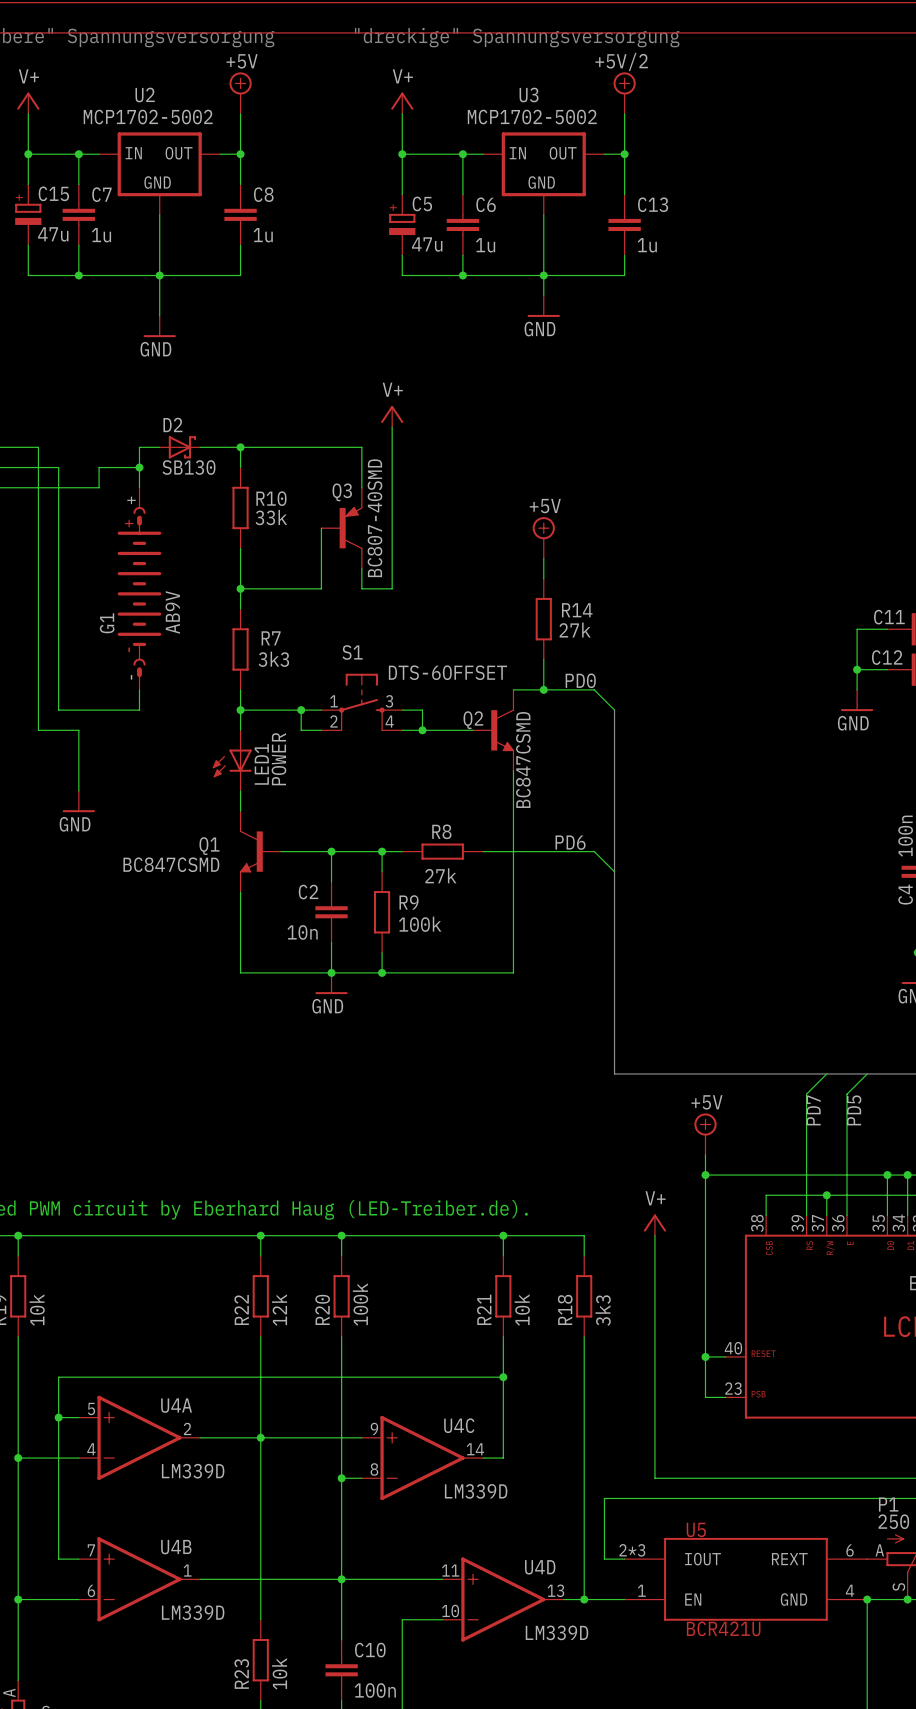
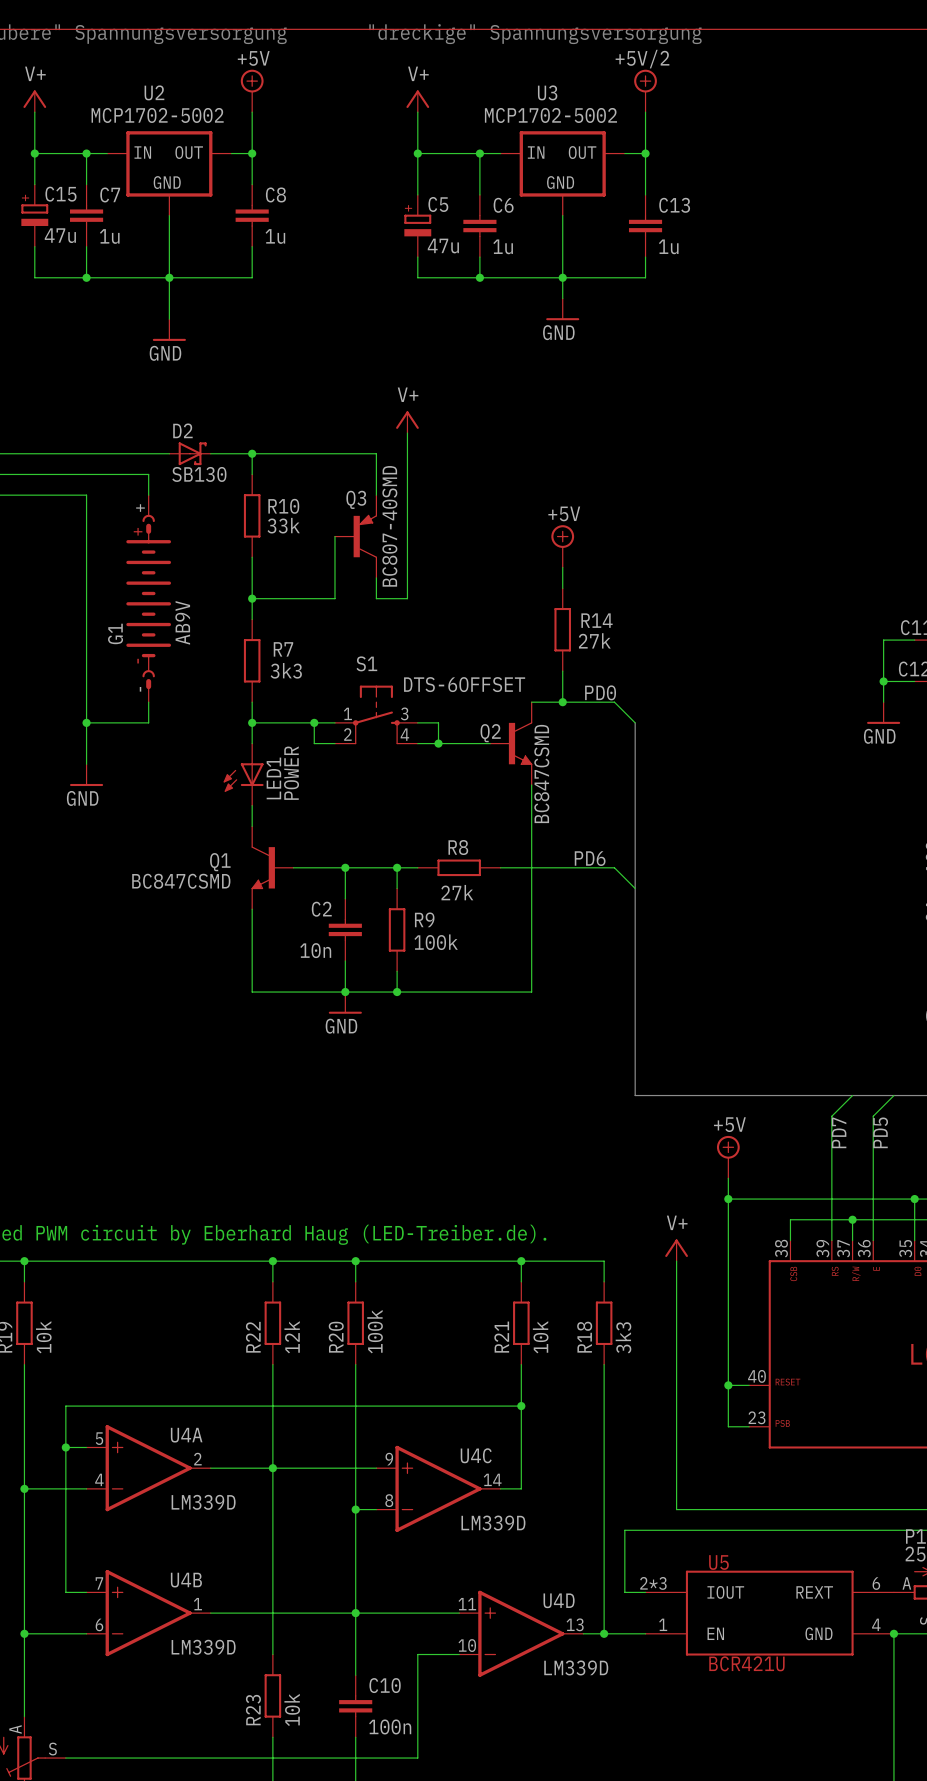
wire: (38, 447) (38, 730) (78, 730) -> (86, 495) (86, 743)
wire: (139, 447) (139, 467) -> (148, 453) (45, 453)
wire: (58, 467) (58, 710) (78, 710) -> none
wire: (99, 467) (99, 487) (78, 487) -> (107, 474) (65, 474)
junction: (139, 467) -> none
junction: none -> (86, 722)
power symbol position: GND (78, 801) -> GND (86, 775)

